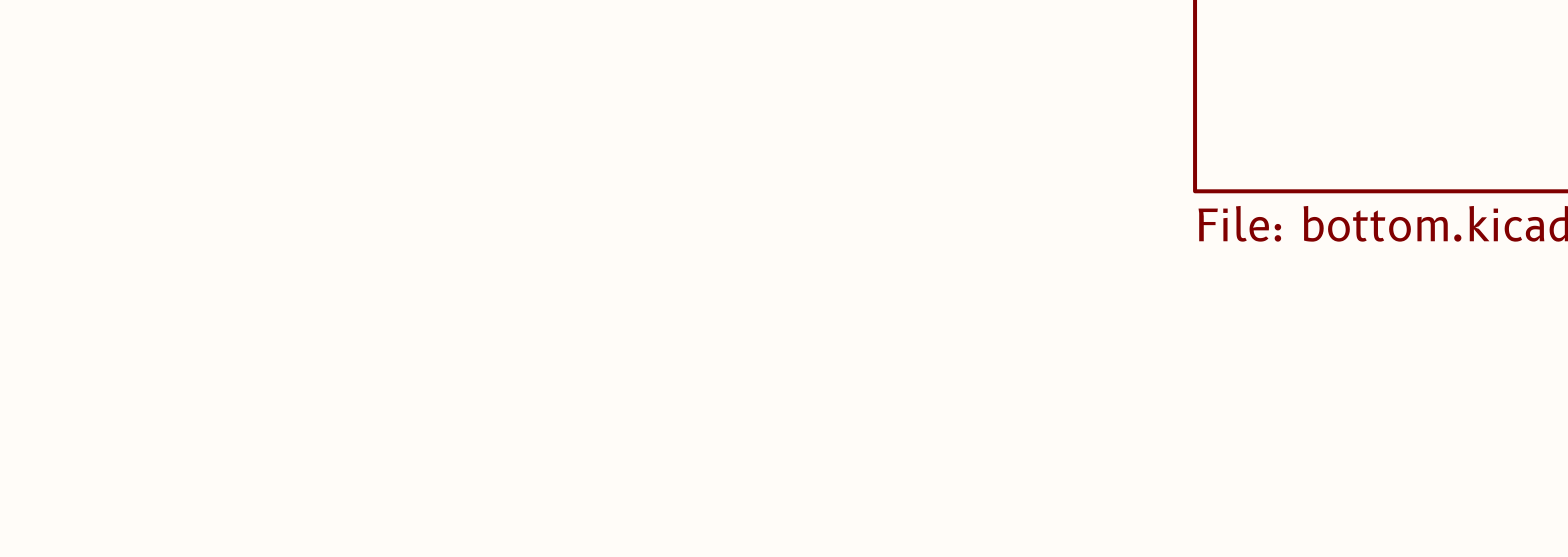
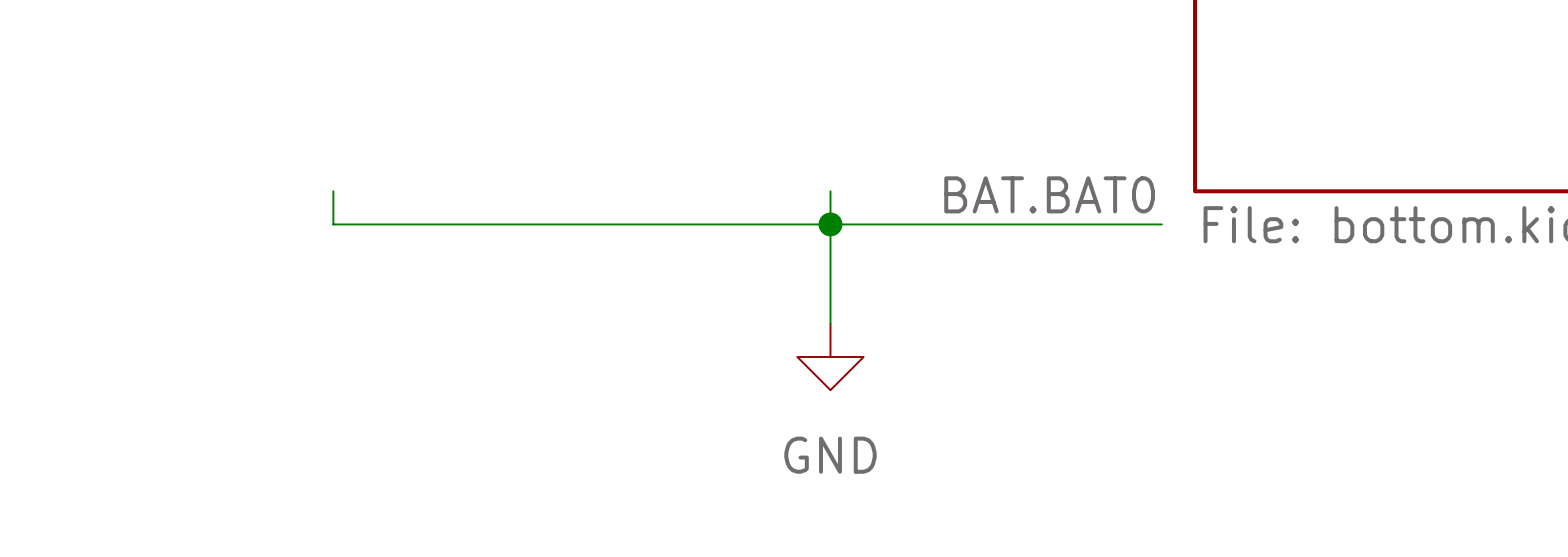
wire: none -> (333, 191) (333, 224) (1161, 224)
wire: none -> (830, 191) (830, 323)
label: none -> BAT.BAT0 (1049, 194)
junction: none -> (830, 224)
power symbol: none -> GND (830, 357)

